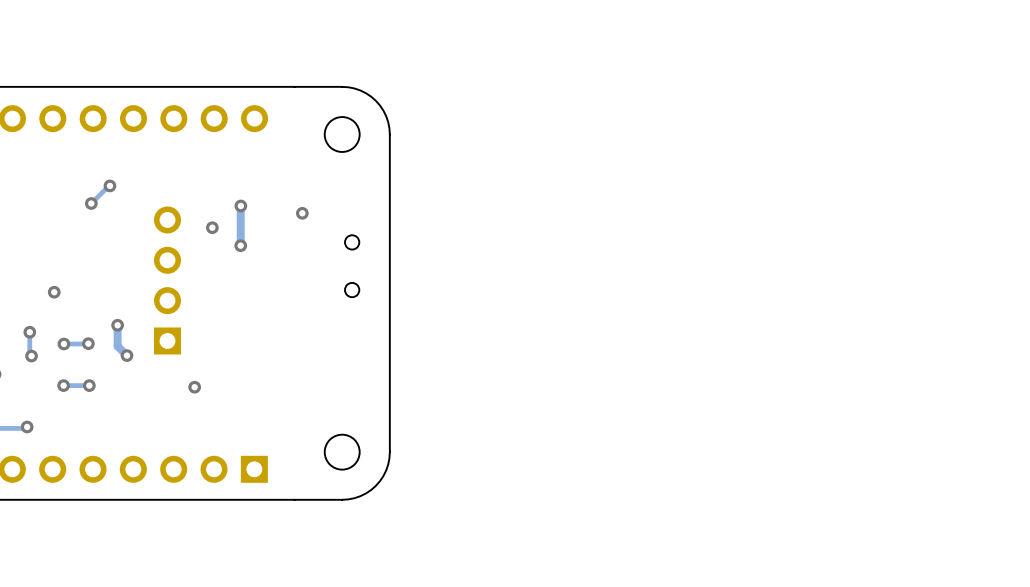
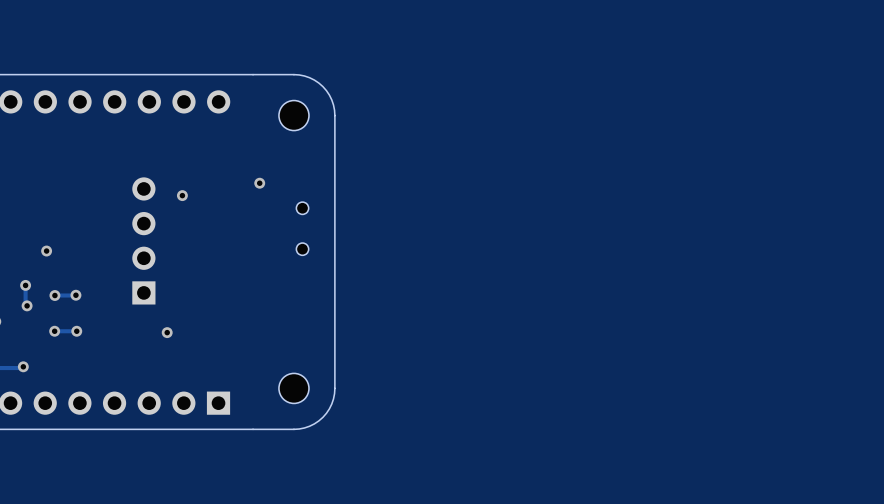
track: (109, 185) (91, 203) -> none
via: (109, 185) -> none
via: (91, 203) -> none
via: (240, 205) -> none
track: (240, 206) (240, 245) -> none
via: (240, 245) -> none
track: (117, 325) (117, 346) (126, 355) -> none
via: (117, 325) -> none
via: (126, 355) -> none

